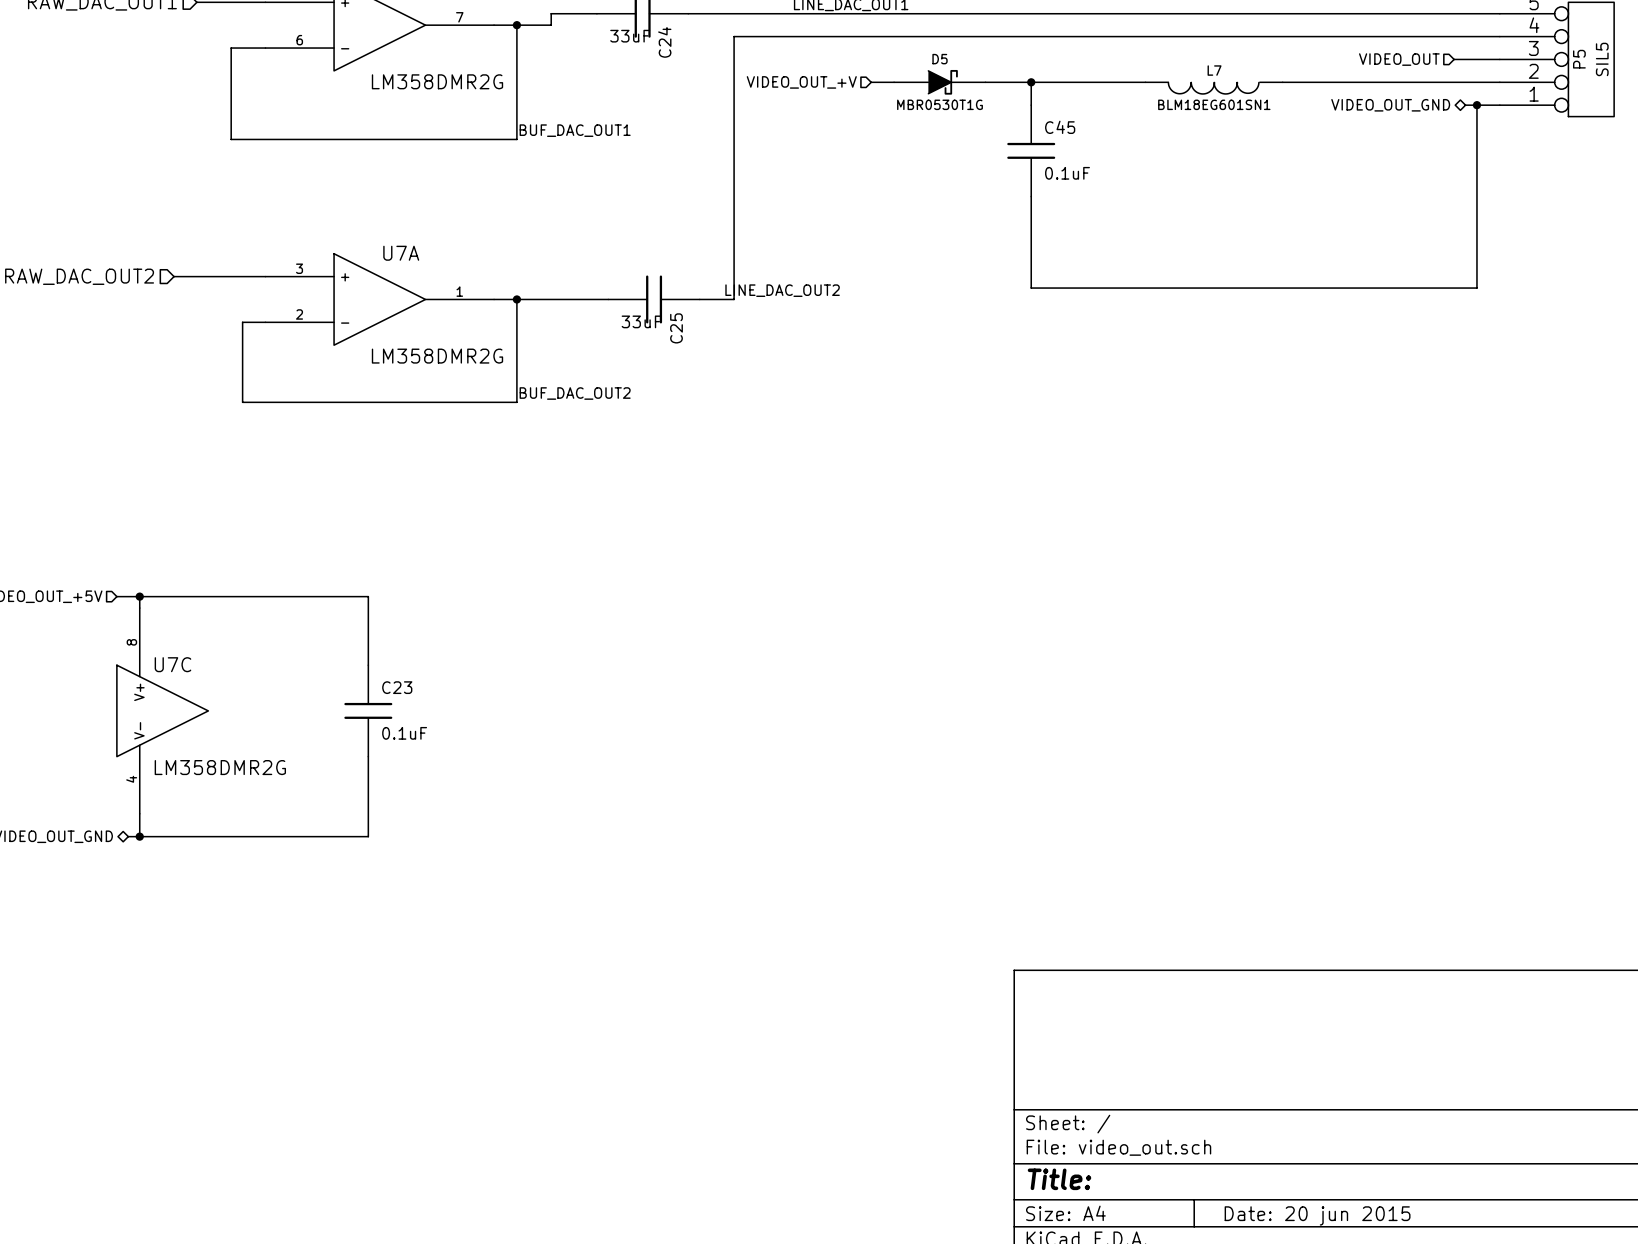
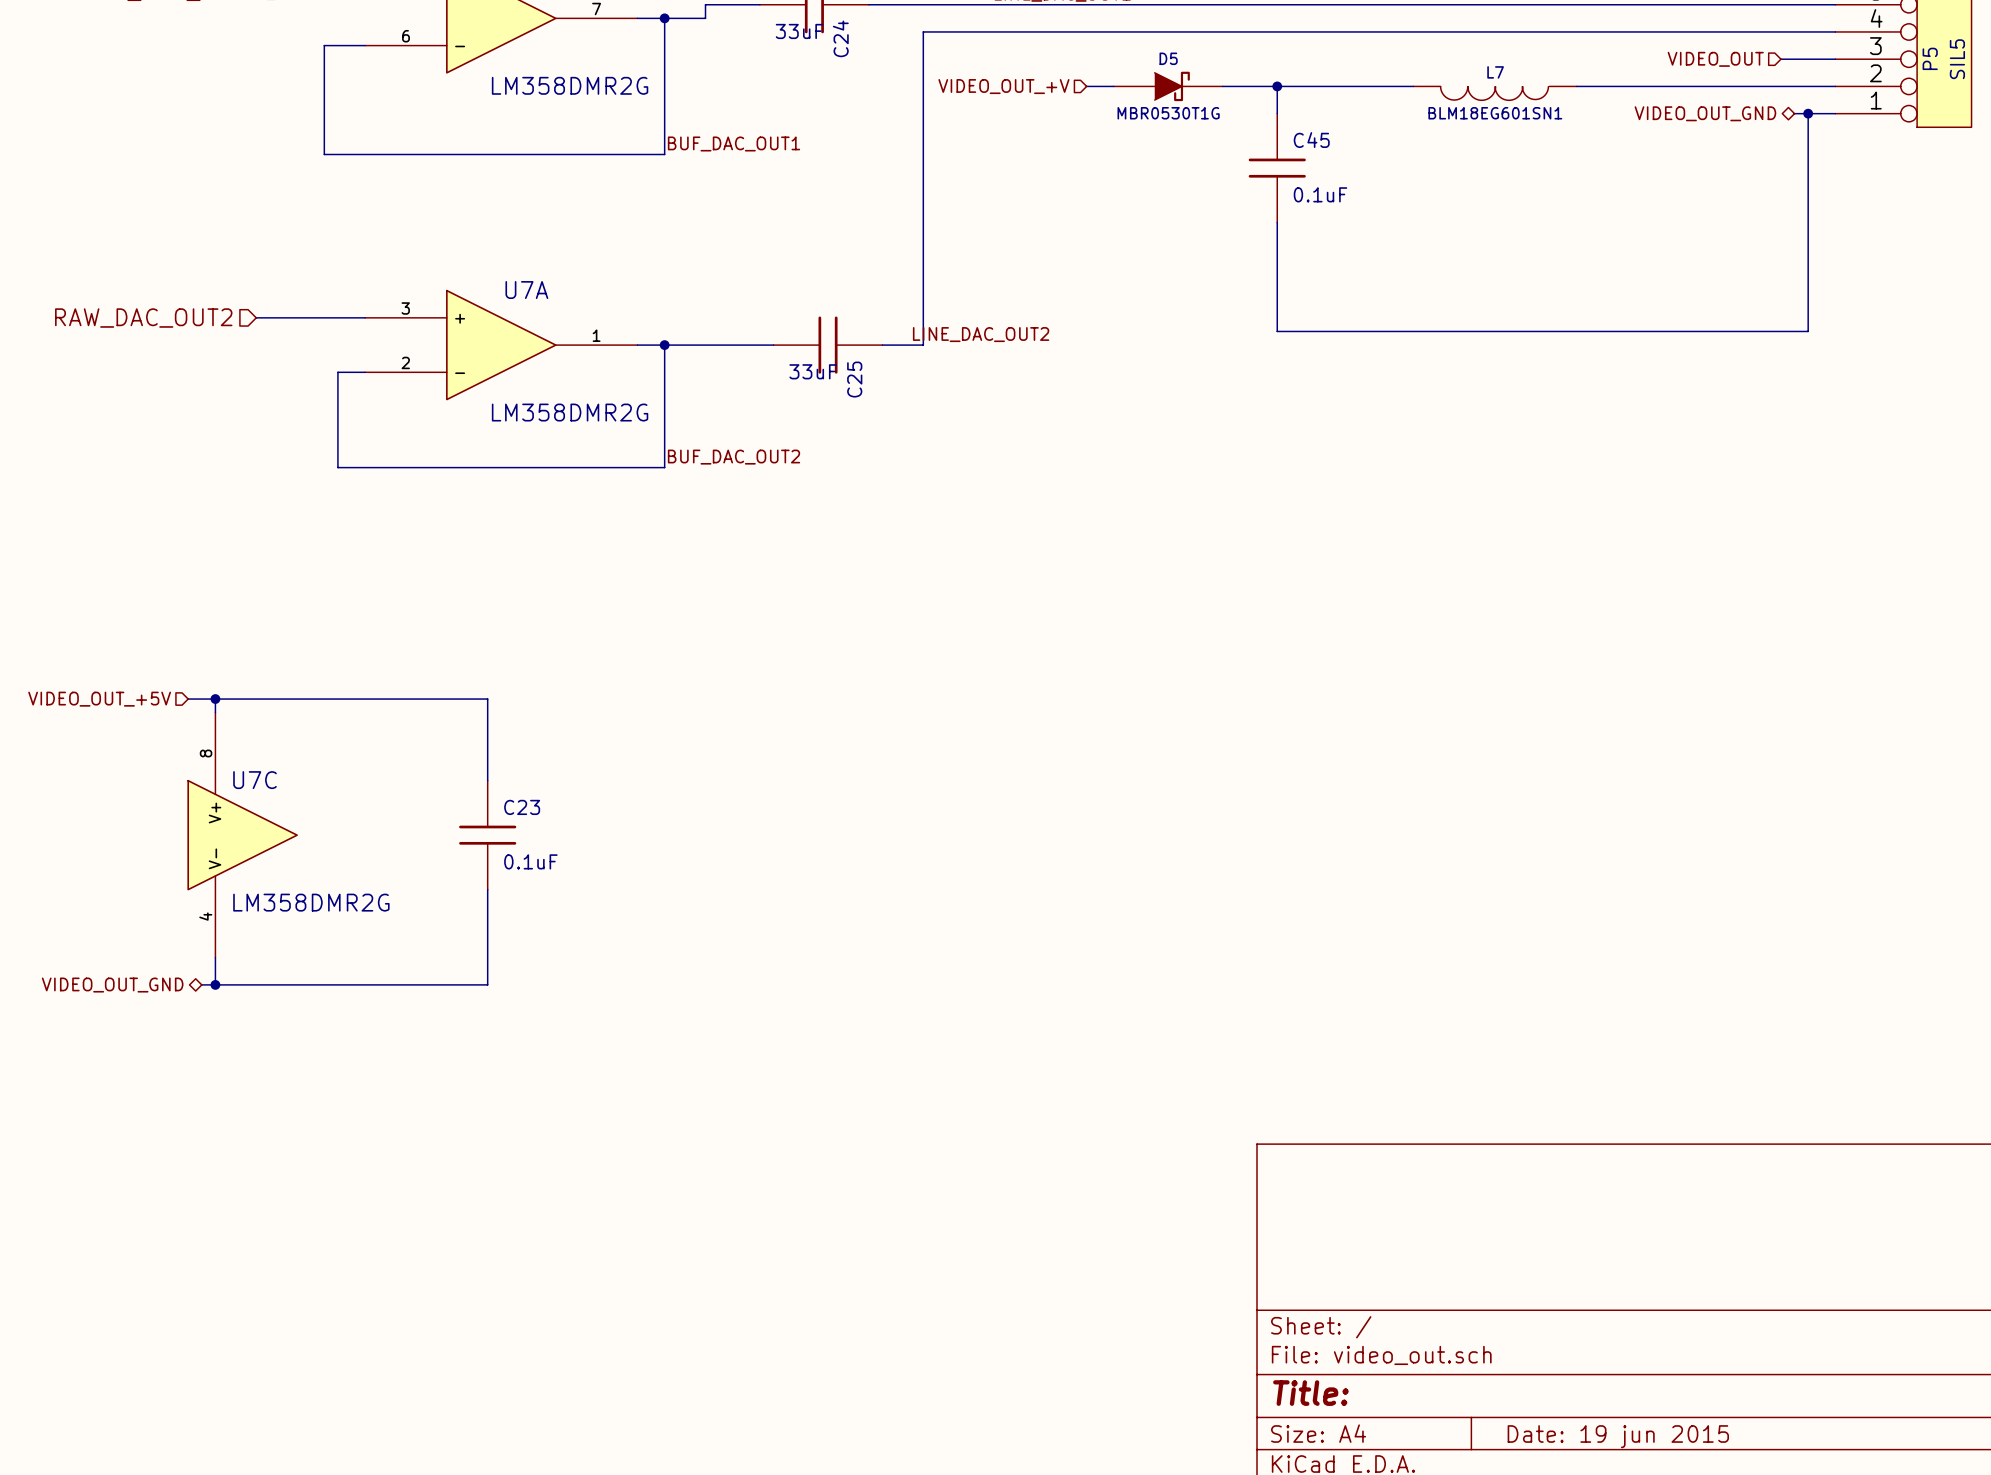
title block: Date: 20 jun 2015 (1317, 1215) -> Date: 19 jun 2015 (1618, 1436)

